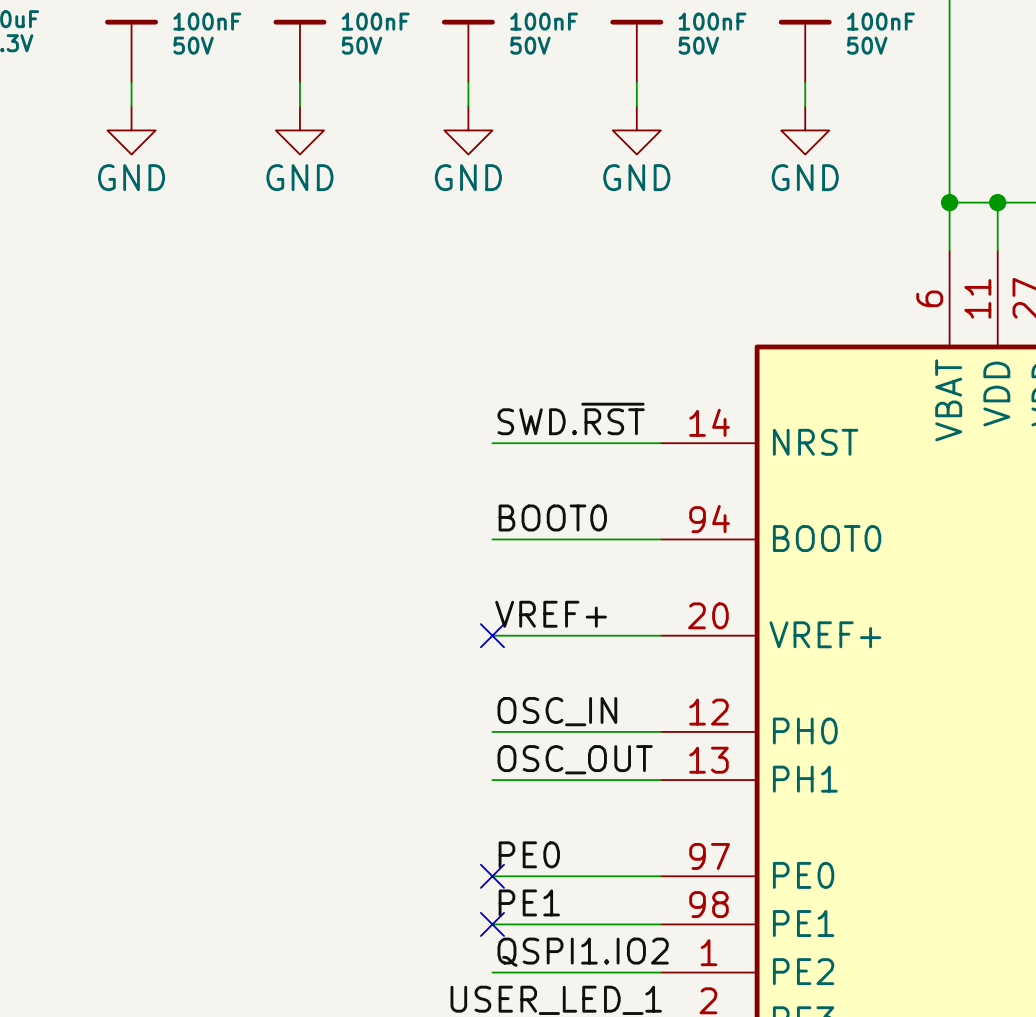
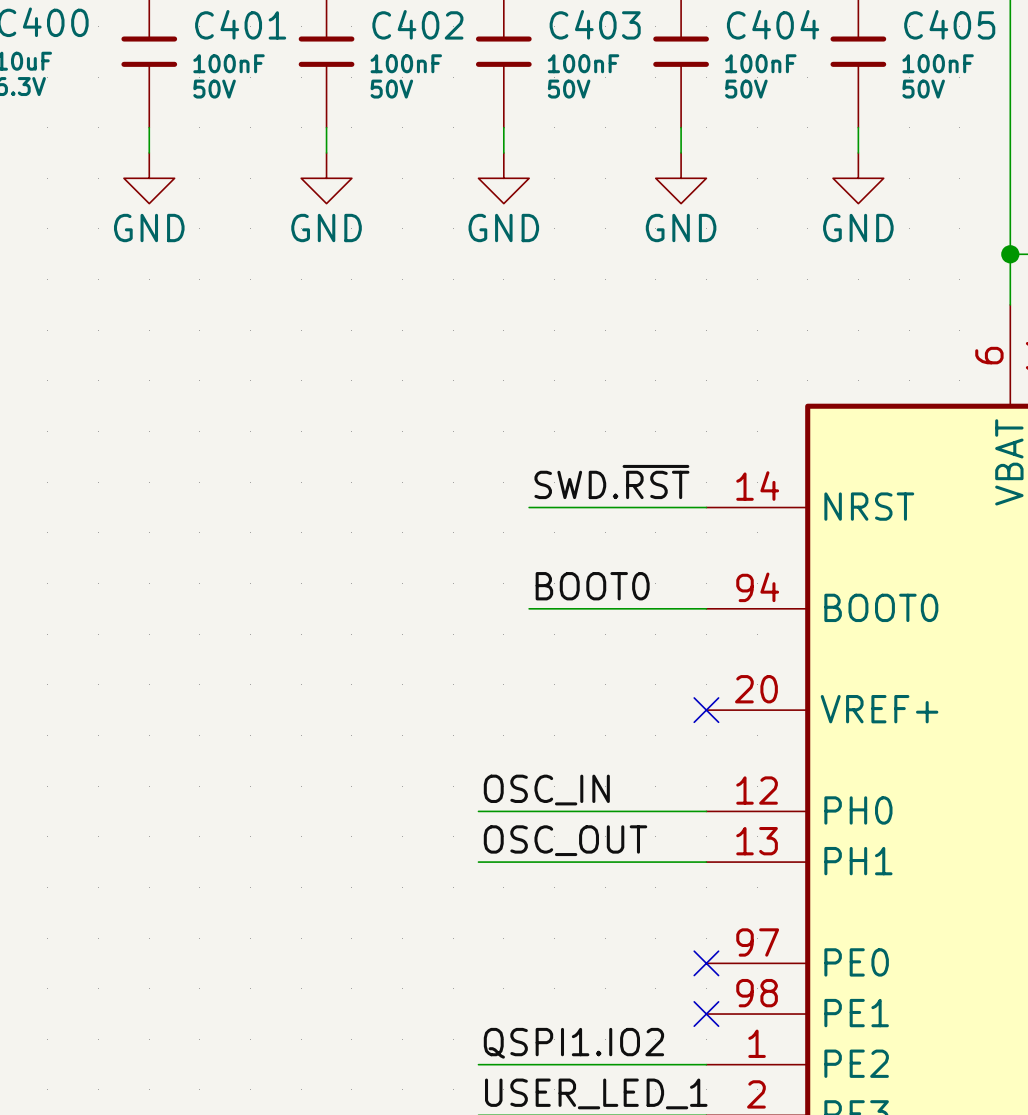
label: VREF+ (551, 614) -> none
wire: (492, 635) (660, 635) -> none
no-connect mark: (492, 635) -> none
no-connect mark: none -> (706, 710)
label position: OSC_IN (557, 711) -> OSC_IN (546, 790)
wire: none -> (478, 811) (529, 811)
label position: OSC_OUT (575, 759) -> OSC_OUT (565, 840)
wire: none -> (478, 862) (529, 862)
label: PE0 (529, 854) -> none
wire: (492, 876) (660, 876) -> none
no-connect mark: (492, 876) -> none
no-connect mark: none -> (706, 963)
label: PE1 (529, 902) -> none
wire: (492, 924) (660, 924) -> none
no-connect mark: (492, 924) -> none
no-connect mark: none -> (706, 1014)
label position: QSPI1.IO2 (583, 952) -> QSPI1.IO2 (573, 1043)
wire: none -> (478, 1064) (529, 1064)

